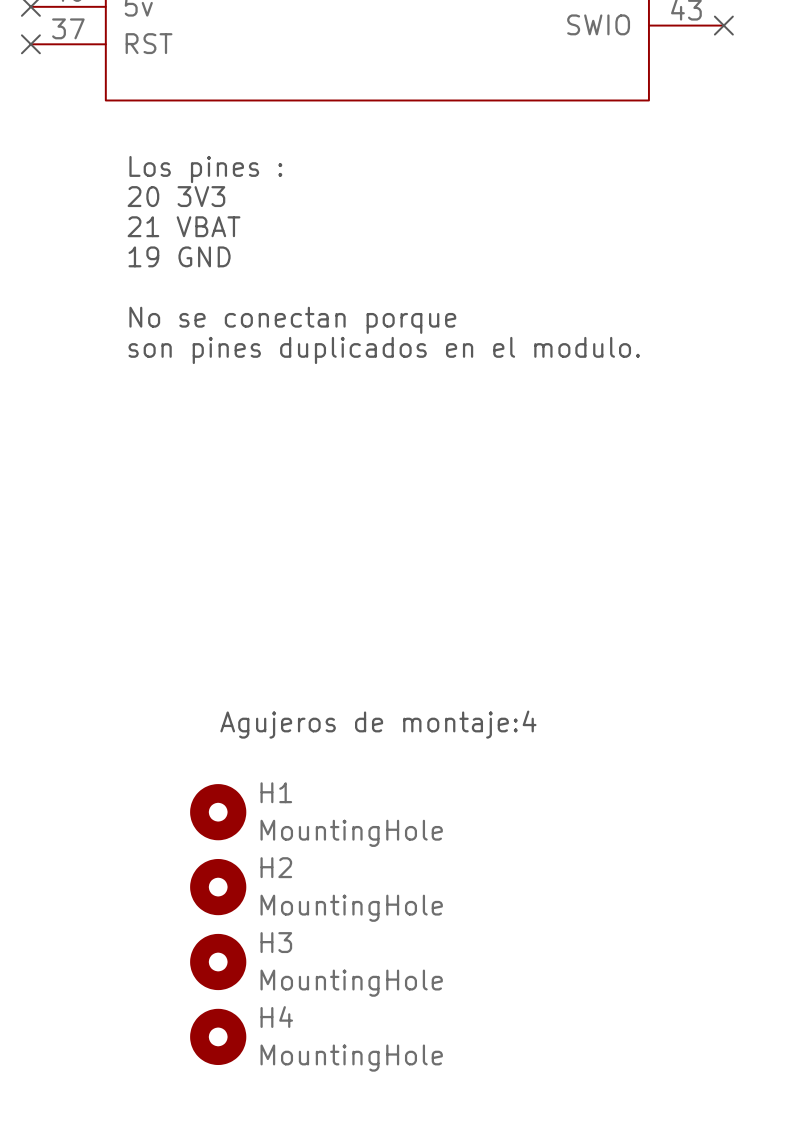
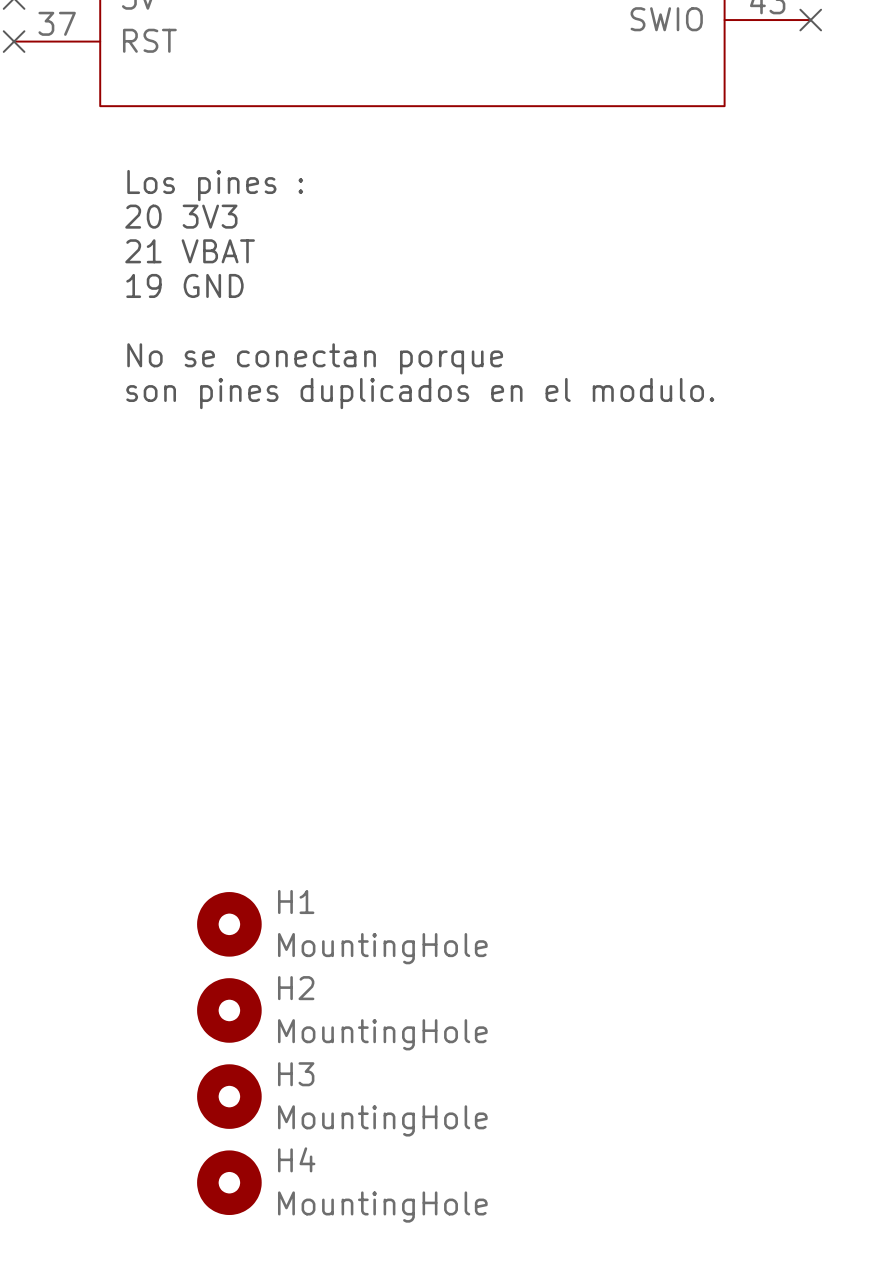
text: Agujeros de montaje:4 (378, 724) -> none

